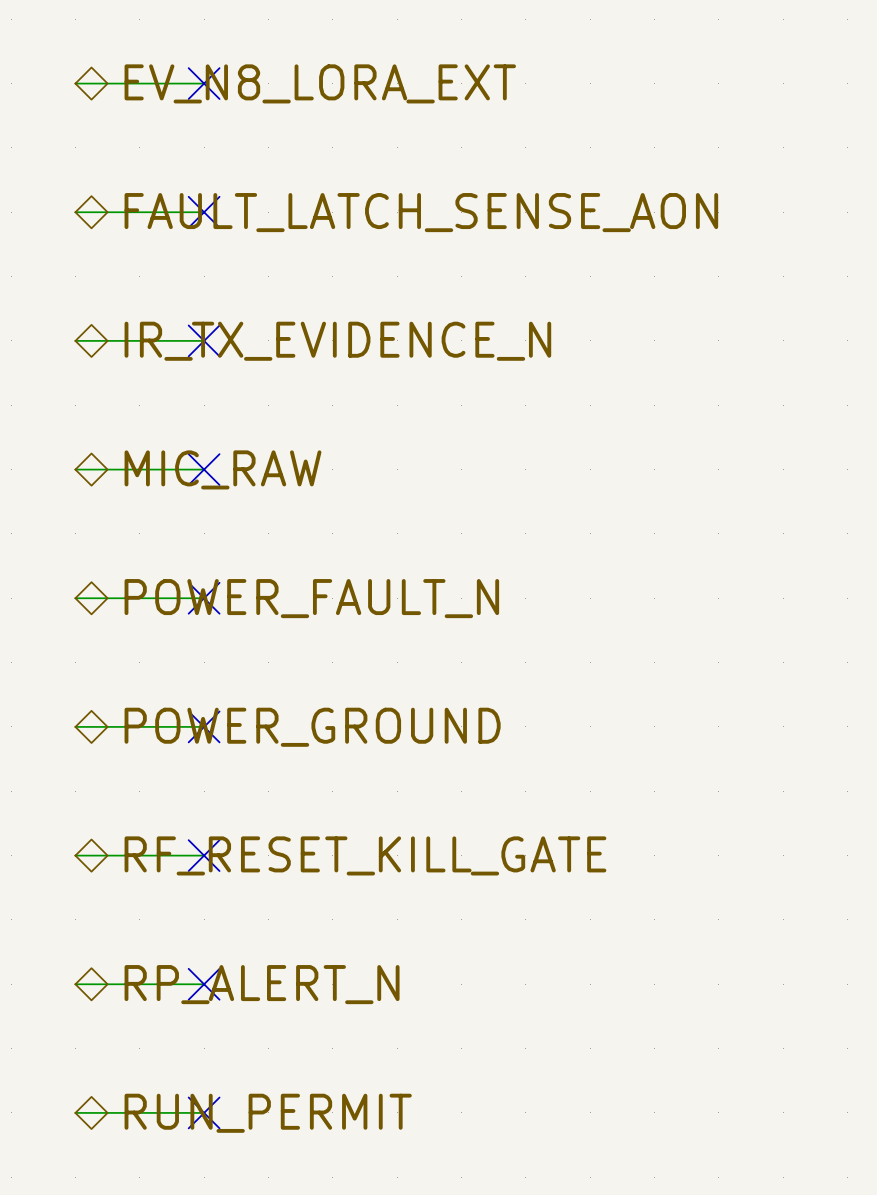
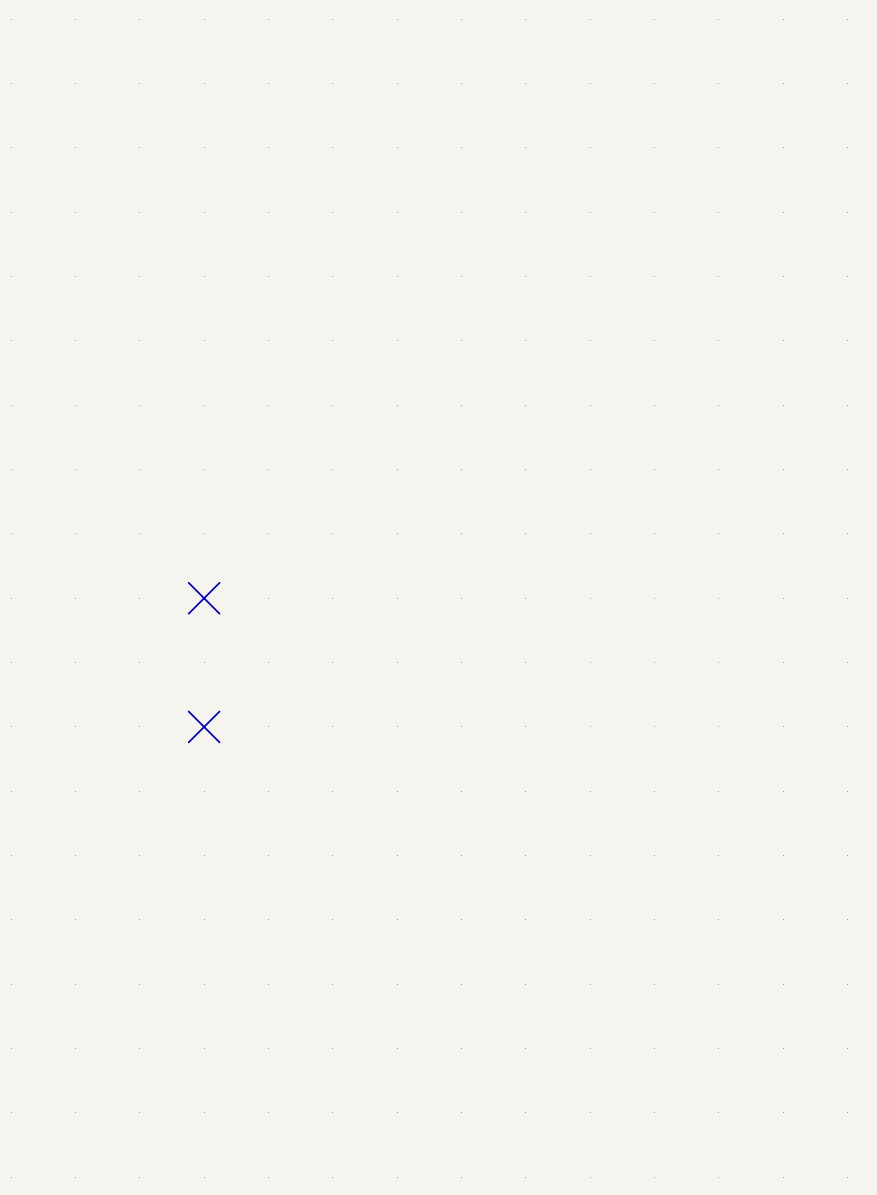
wire: (75, 83) (204, 83) -> none
no-connect mark: (204, 83) -> none
hierarchical label: EV_N8_LORA_EXT (320, 83) -> none
wire: (75, 212) (204, 212) -> none
no-connect mark: (204, 212) -> none
hierarchical label: FAULT_LATCH_SENSE_AON (421, 212) -> none
wire: (75, 340) (204, 340) -> none
no-connect mark: (204, 340) -> none
hierarchical label: IR_TX_EVIDENCE_N (337, 341) -> none
wire: (75, 469) (204, 469) -> none
no-connect mark: (204, 469) -> none
hierarchical label: MIC_RAW (222, 469) -> none
wire: (75, 598) (204, 598) -> none
hierarchical label: POWER_FAULT_N (311, 598) -> none
wire: (75, 726) (204, 726) -> none
hierarchical label: POWER_GROUND (312, 727) -> none
wire: (75, 855) (204, 855) -> none
no-connect mark: (204, 855) -> none
hierarchical label: RF_RESET_KILL_GATE (365, 855) -> none
wire: (75, 984) (204, 984) -> none
no-connect mark: (204, 984) -> none
hierarchical label: RP_ALERT_N (262, 984) -> none
wire: (75, 1112) (204, 1112) -> none
no-connect mark: (204, 1112) -> none
hierarchical label: RUN_PERMIT (268, 1113) -> none

